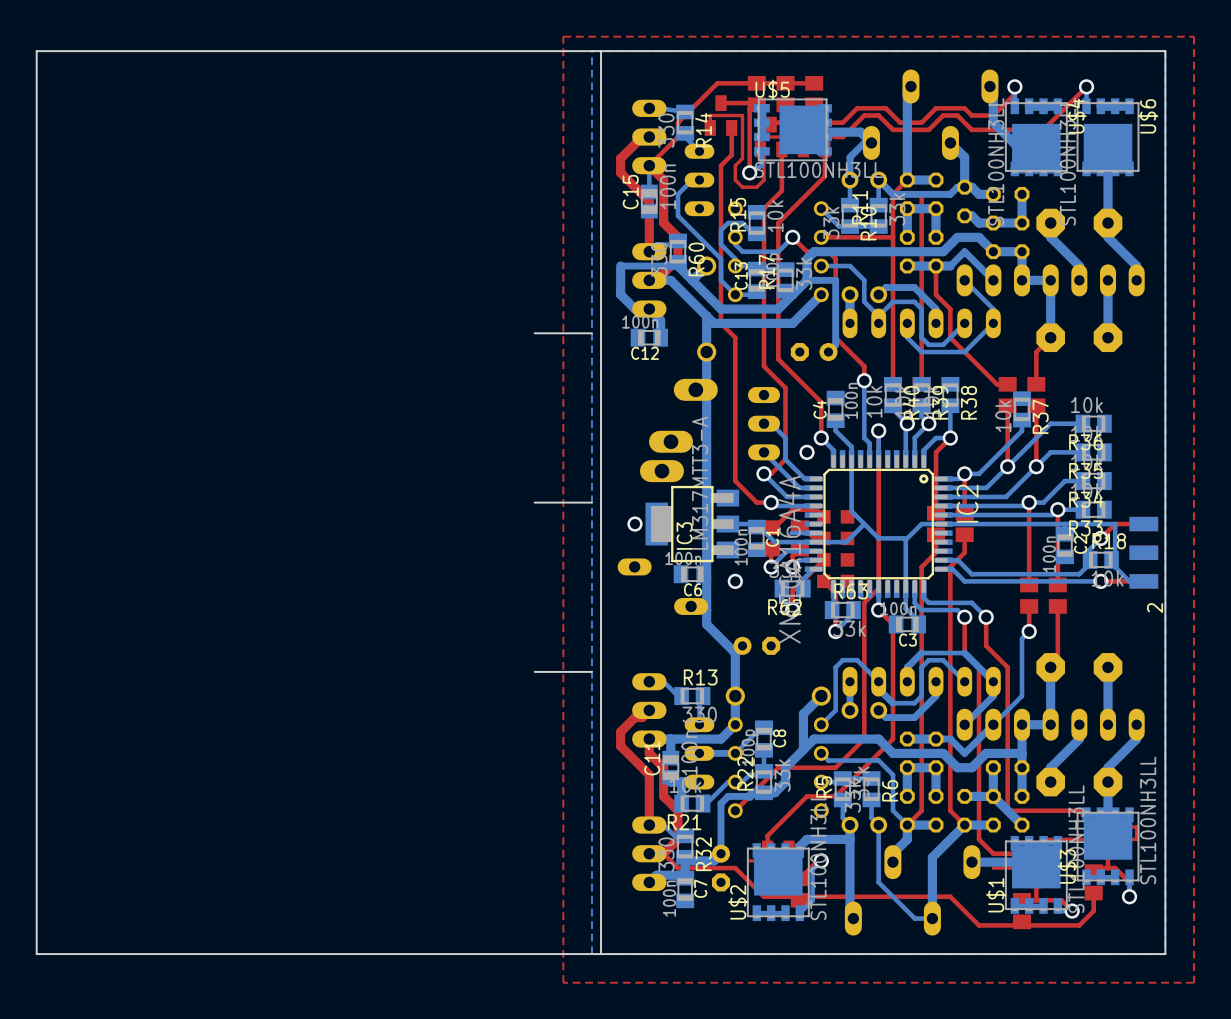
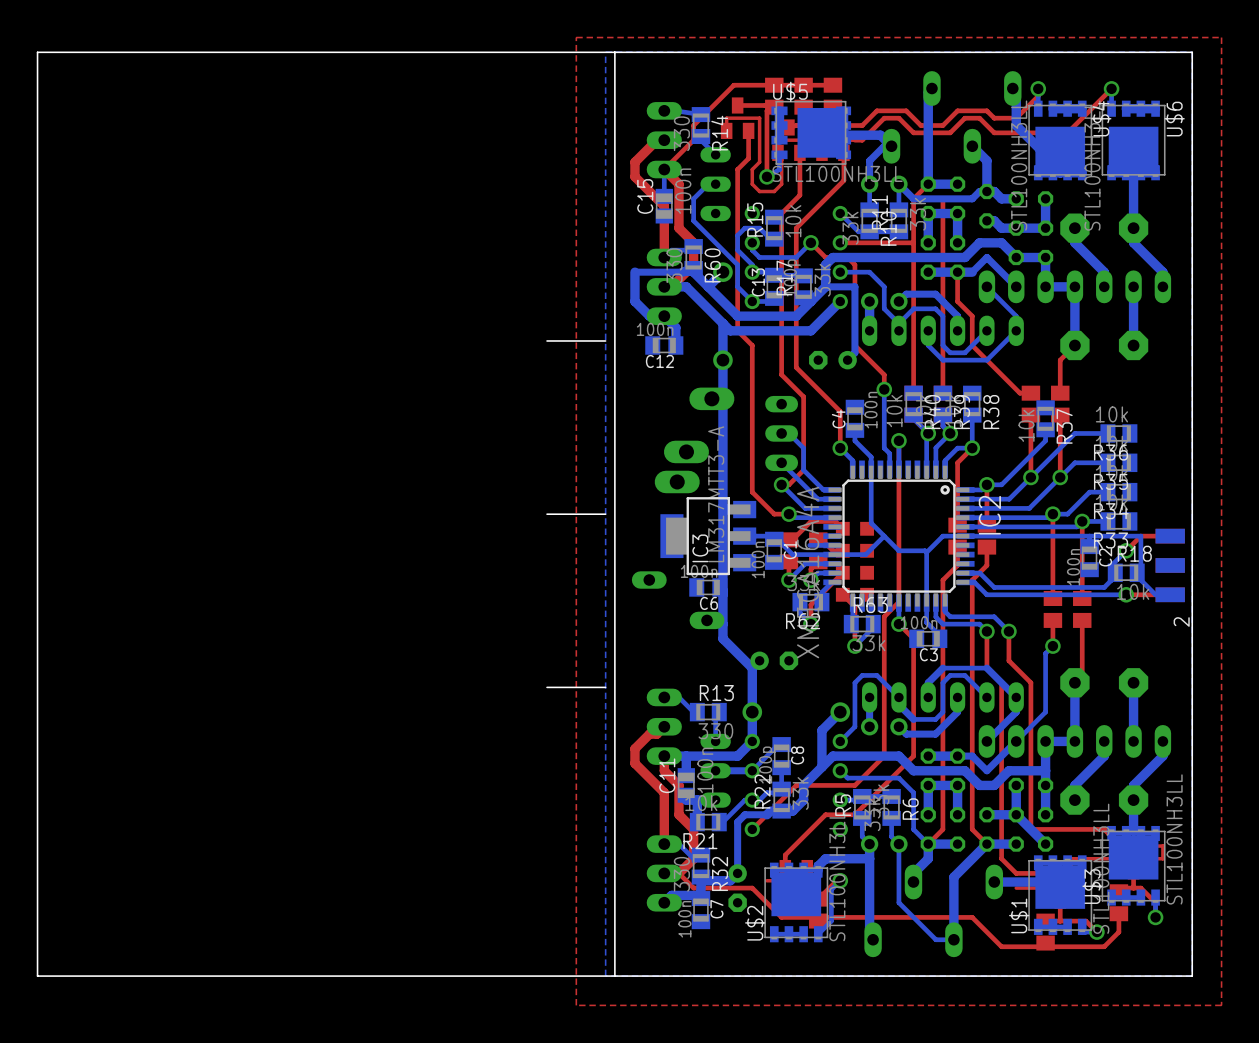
via: (807, 452) -> none
via: (634, 524) -> none
via: (735, 581) -> none

